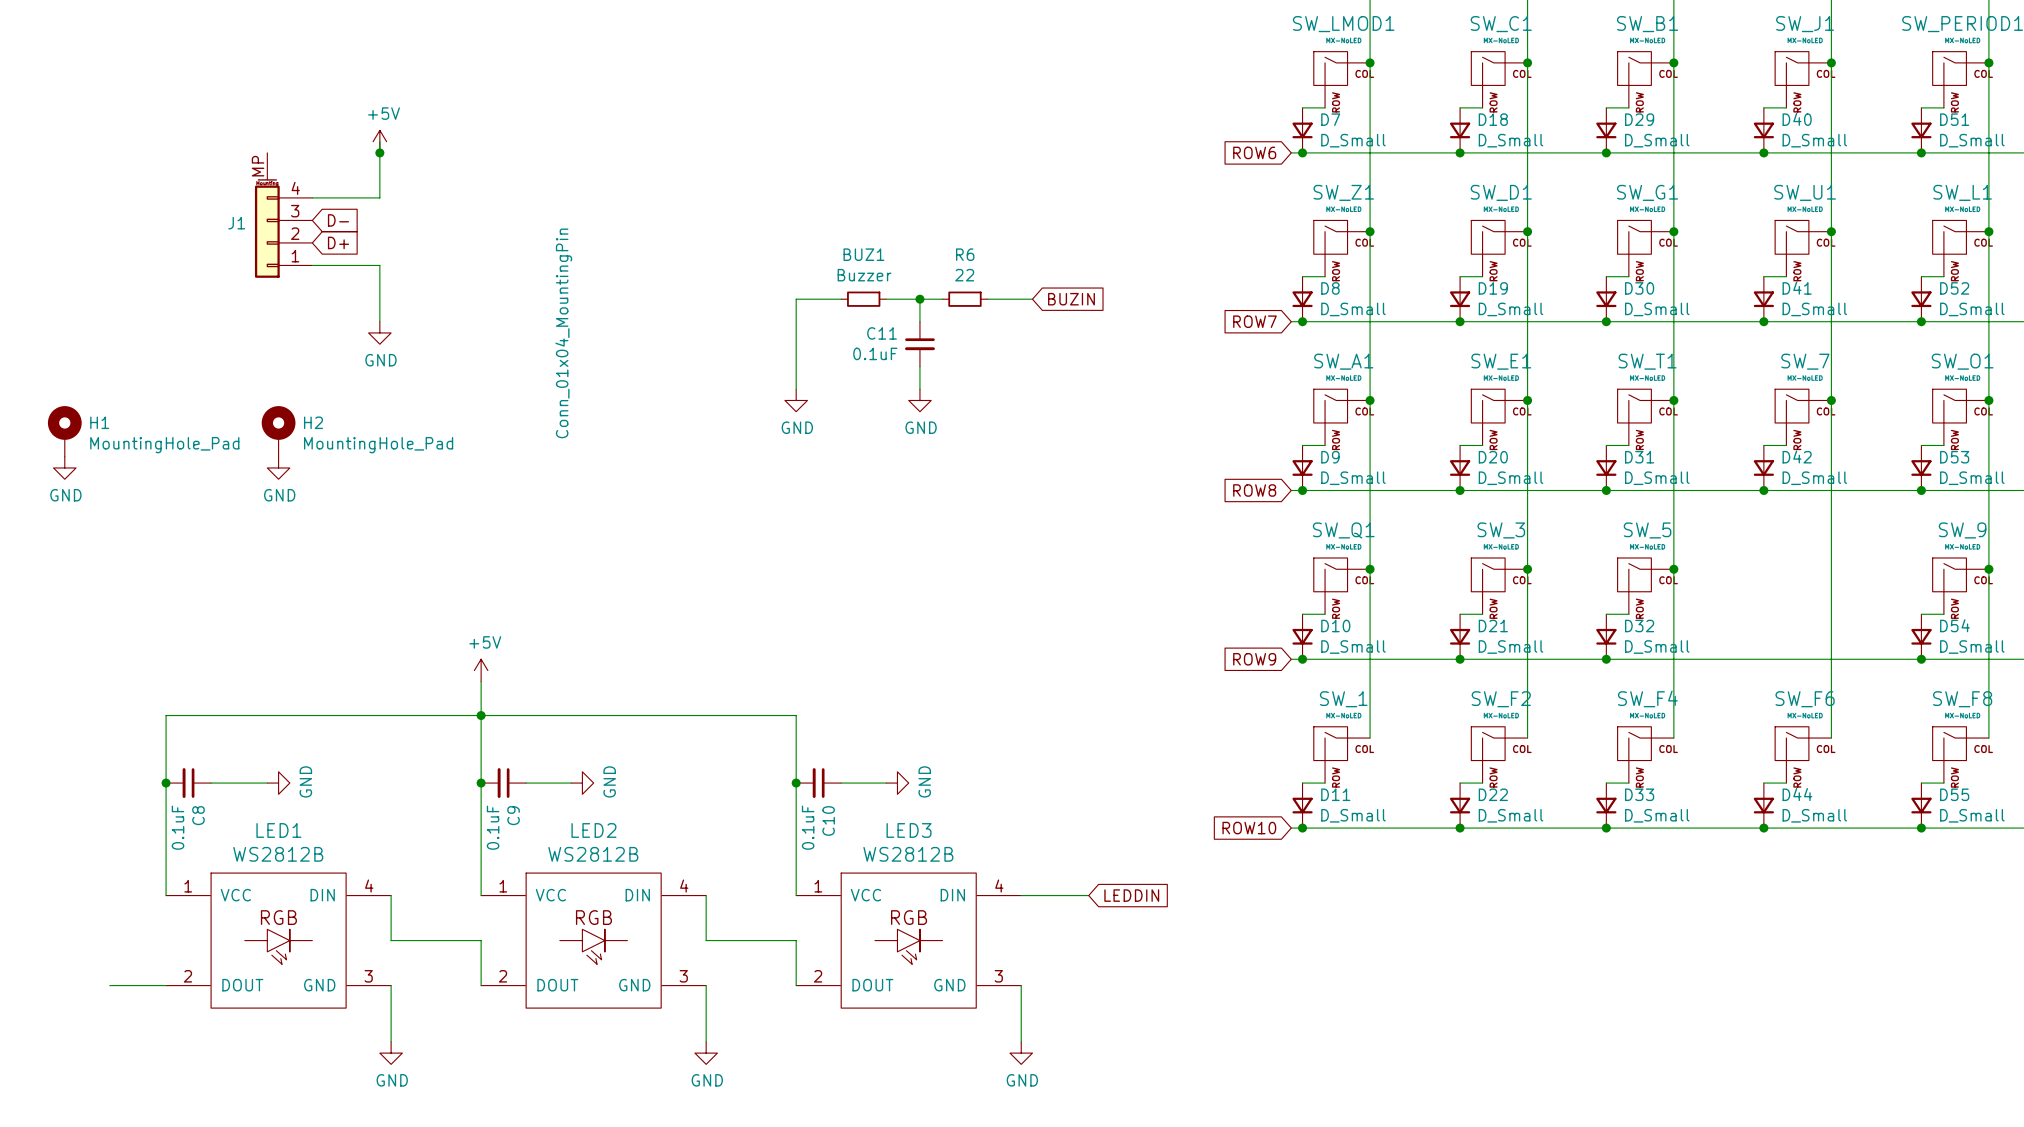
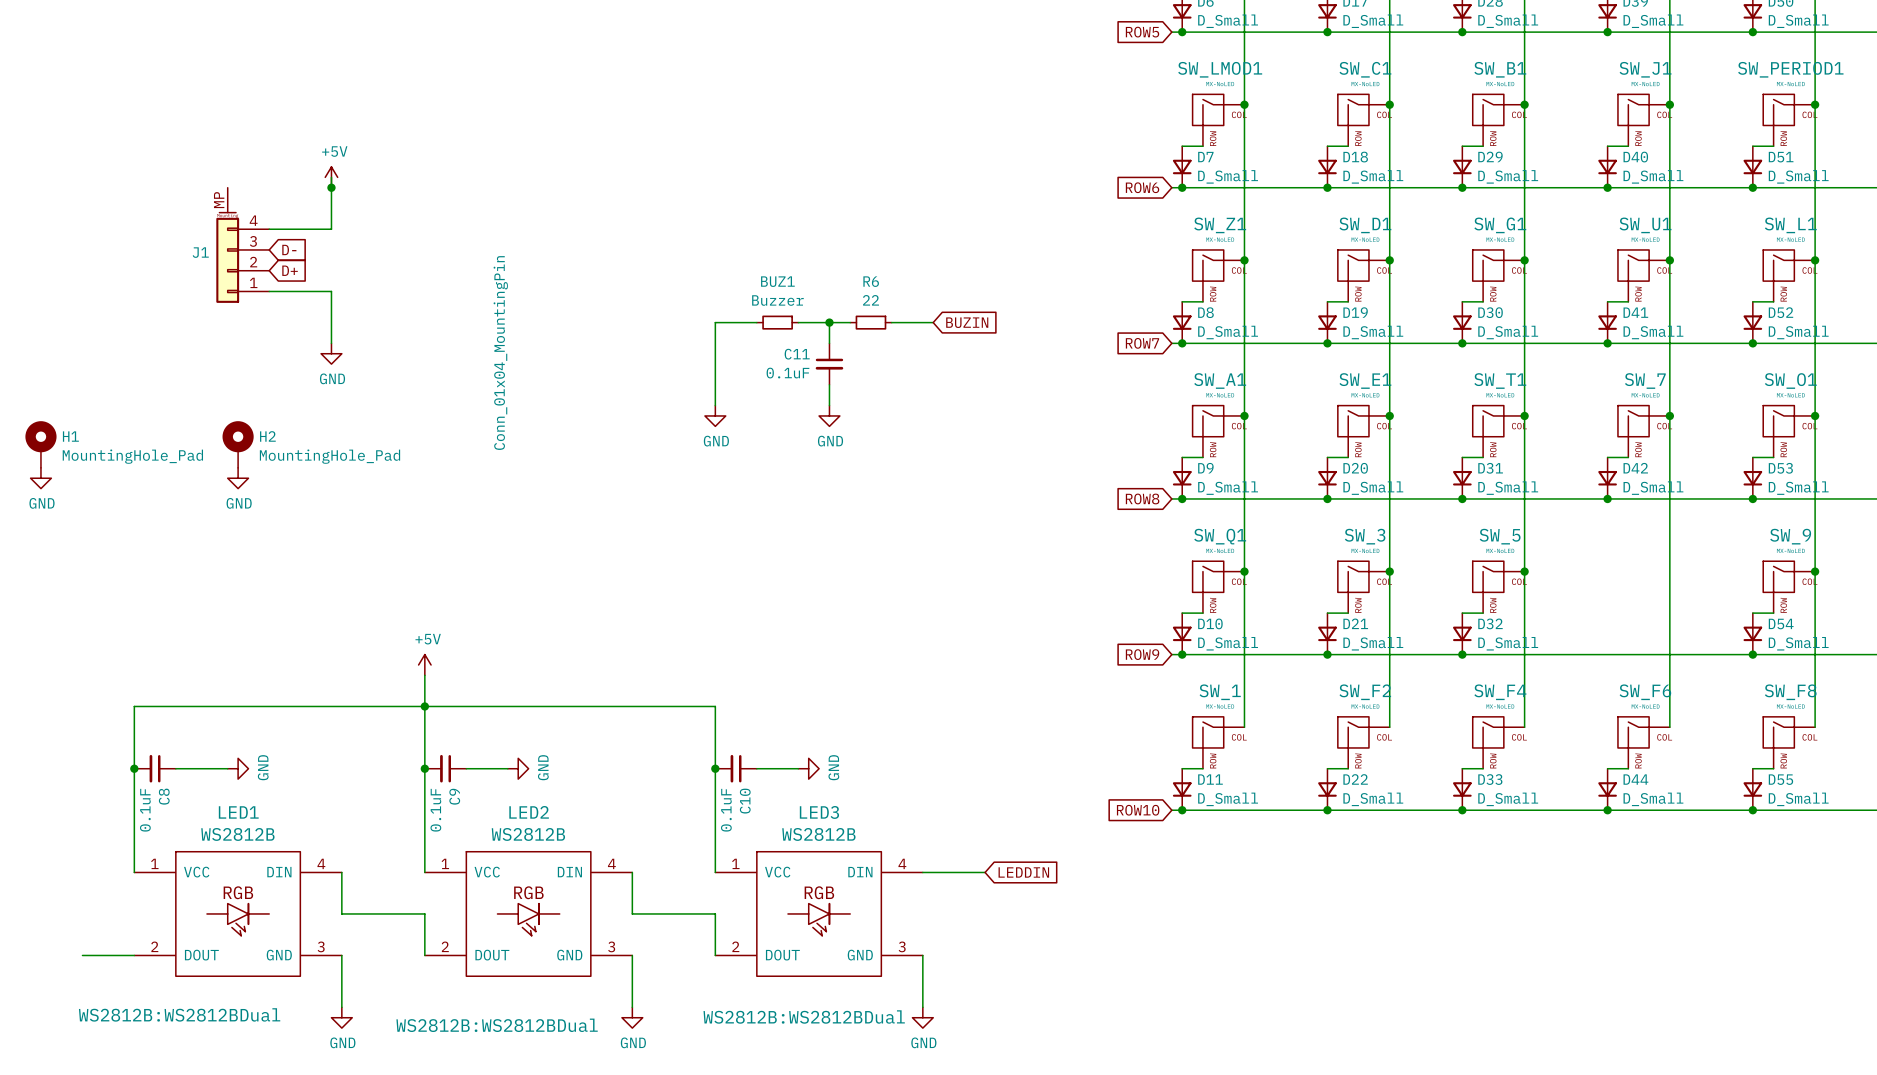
LED1 text: none -> WS2812B:WS2812BDual (179, 1014)
LED3 text: none -> WS2812B:WS2812BDual (804, 1017)
LED2 text: none -> WS2812B:WS2812BDual (497, 1025)

